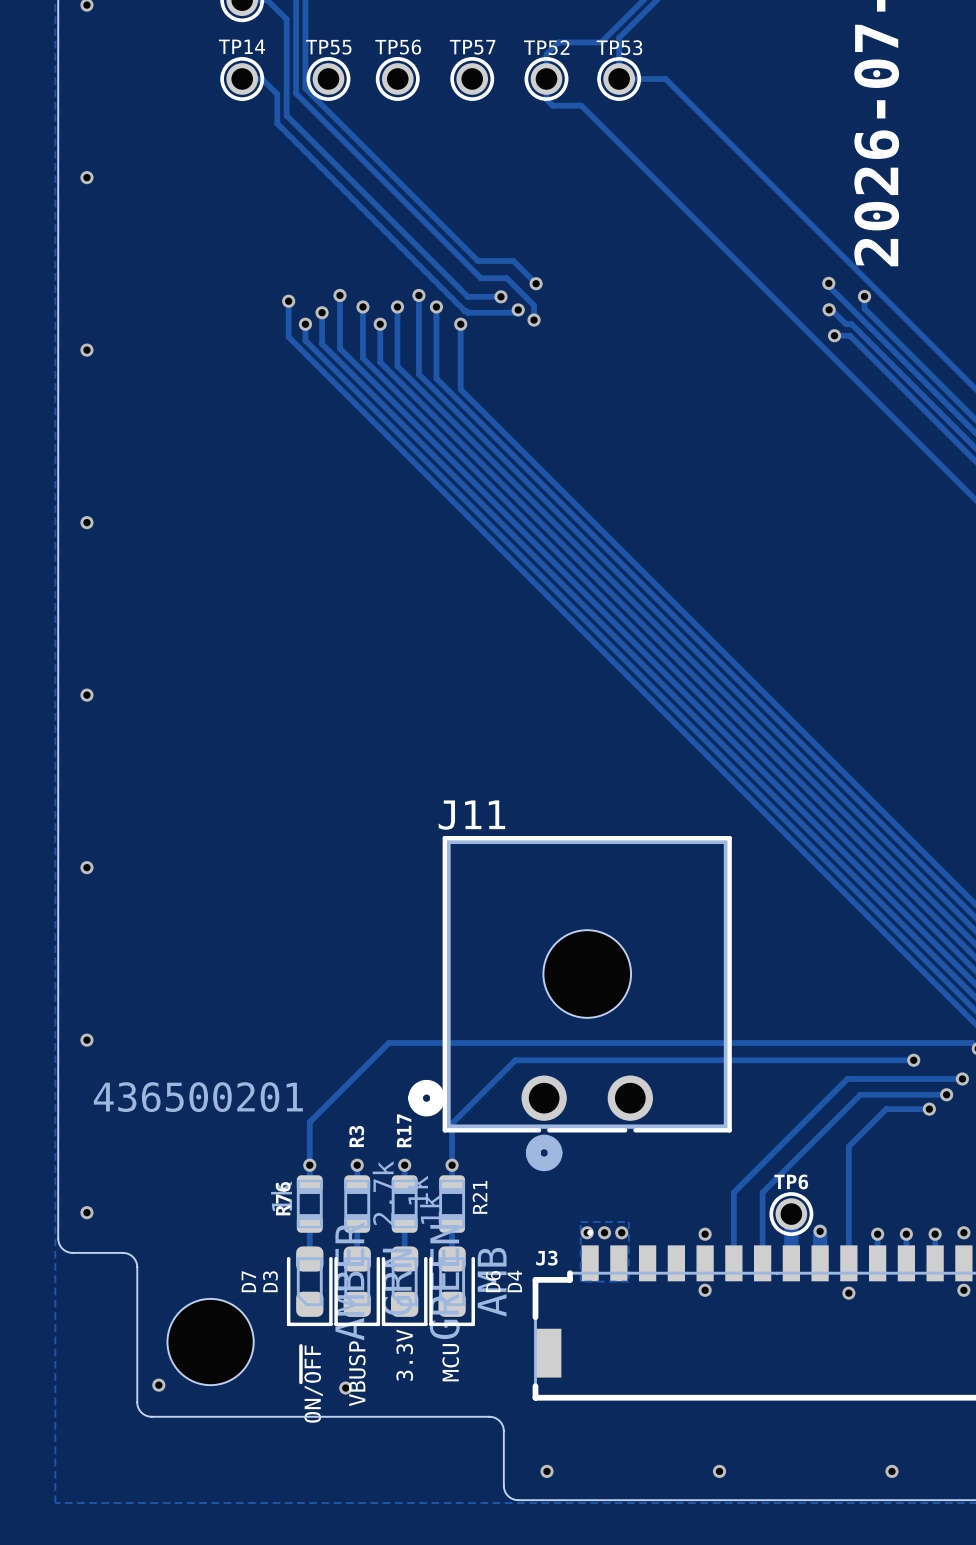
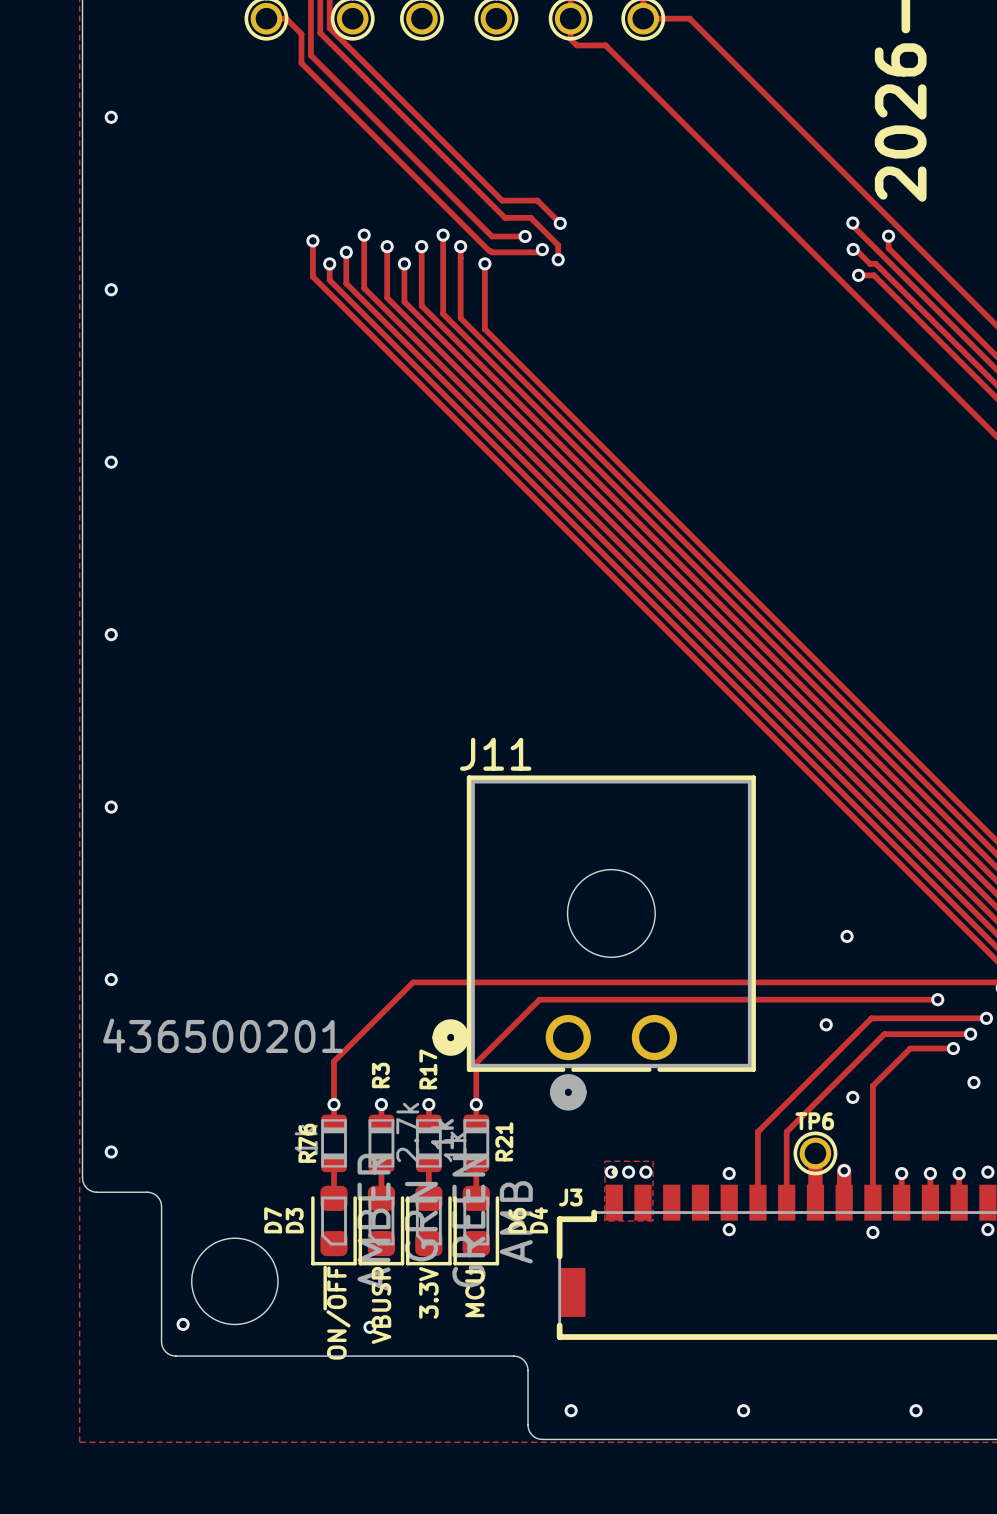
via: none -> (847, 936)
via: none -> (826, 1024)
via: none -> (973, 1082)
via: none -> (852, 1097)

